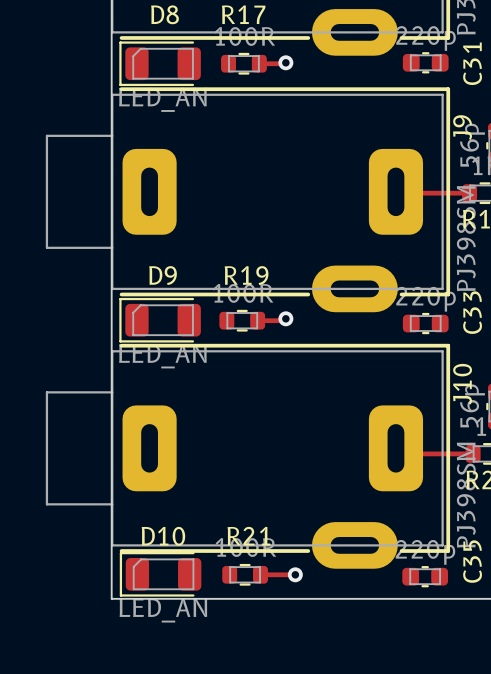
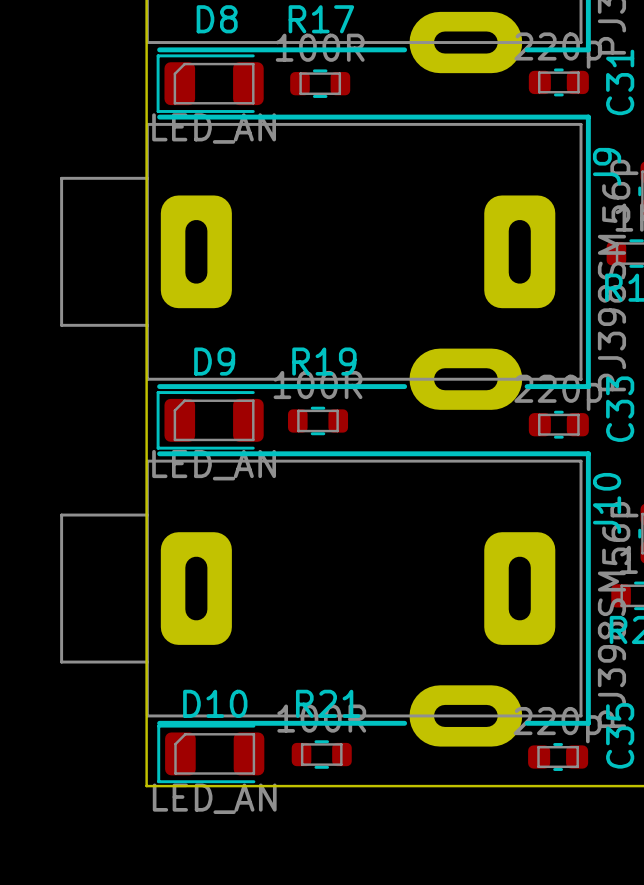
track: (285, 62) (259, 63) -> none
via: (285, 62) -> none
track: (395, 191) (469, 193) -> none
track: (285, 318) (283, 320) (257, 320) -> none
via: (285, 318) -> none
track: (395, 448) (401, 453) (473, 453) -> none
track: (260, 574) (295, 574) -> none
via: (295, 574) -> none

